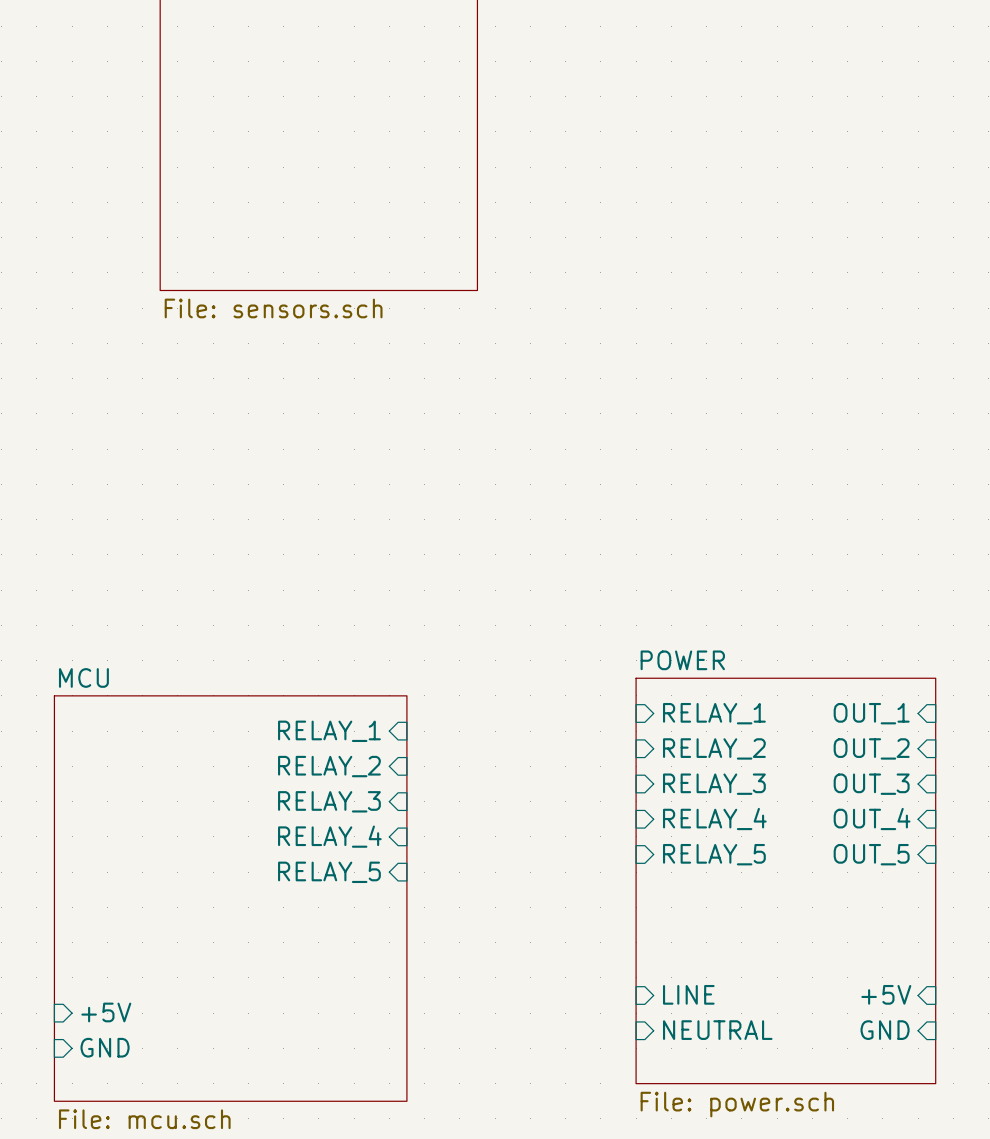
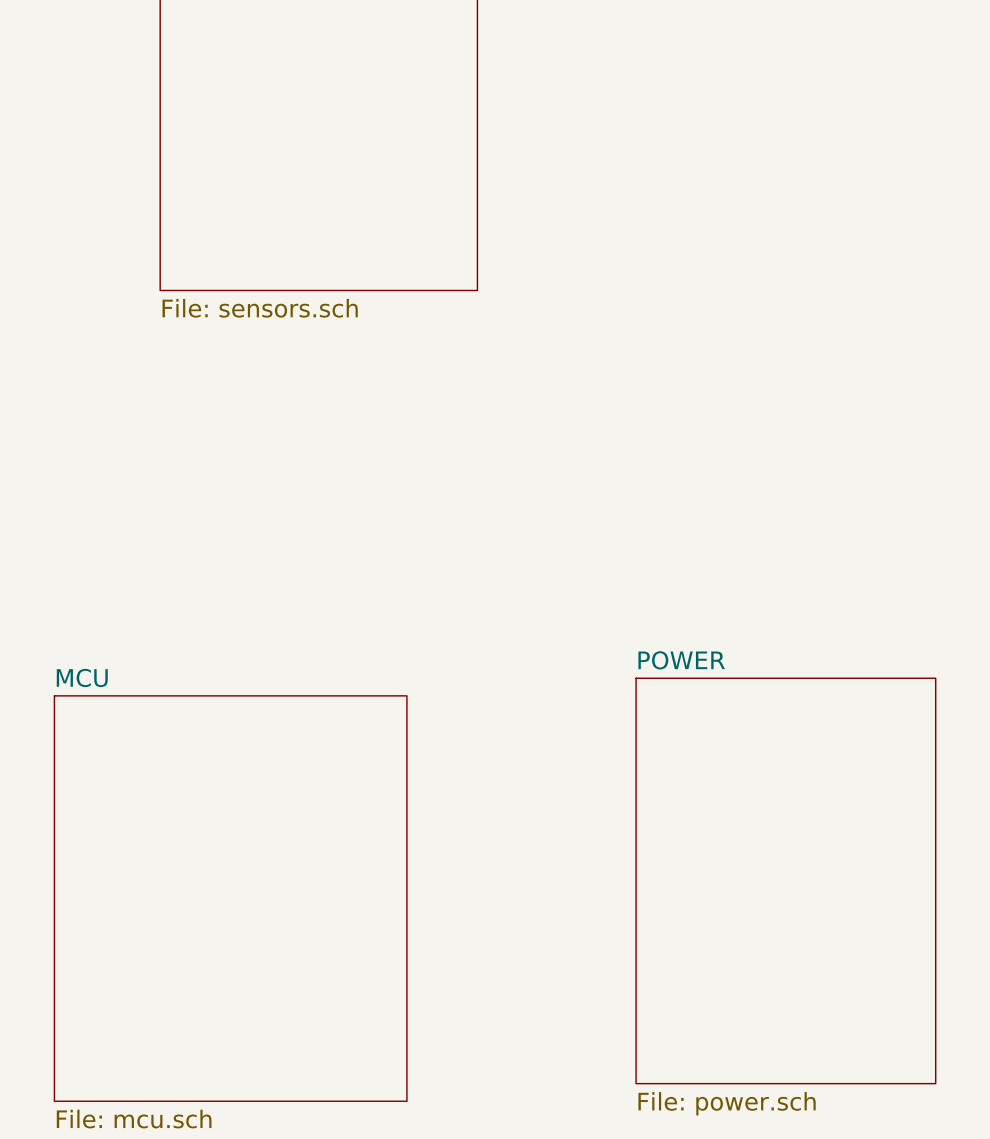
sheet pin: RELAY_1 (714, 713) -> none
sheet pin: OUT_1 (871, 713) -> none
sheet pin: RELAY_1 (329, 731) -> none
sheet pin: RELAY_2 (714, 748) -> none
sheet pin: OUT_2 (871, 748) -> none
sheet pin: RELAY_2 (329, 766) -> none
sheet pin: RELAY_3 (714, 784) -> none
sheet pin: OUT_3 (871, 784) -> none
sheet pin: RELAY_3 (329, 801) -> none
sheet pin: RELAY_4 (714, 819) -> none
sheet pin: OUT_4 (872, 819) -> none
sheet pin: RELAY_4 (329, 836) -> none
sheet pin: RELAY_5 (714, 854) -> none
sheet pin: OUT_5 (871, 854) -> none
sheet pin: RELAY_5 (329, 872) -> none
sheet pin: LINE (688, 994) -> none
sheet pin: +5V (886, 994) -> none
sheet pin: +5V (106, 1012) -> none
sheet pin: NEUTRAL (717, 1030) -> none
sheet pin: GND (885, 1030) -> none
sheet pin: GND (105, 1047) -> none

